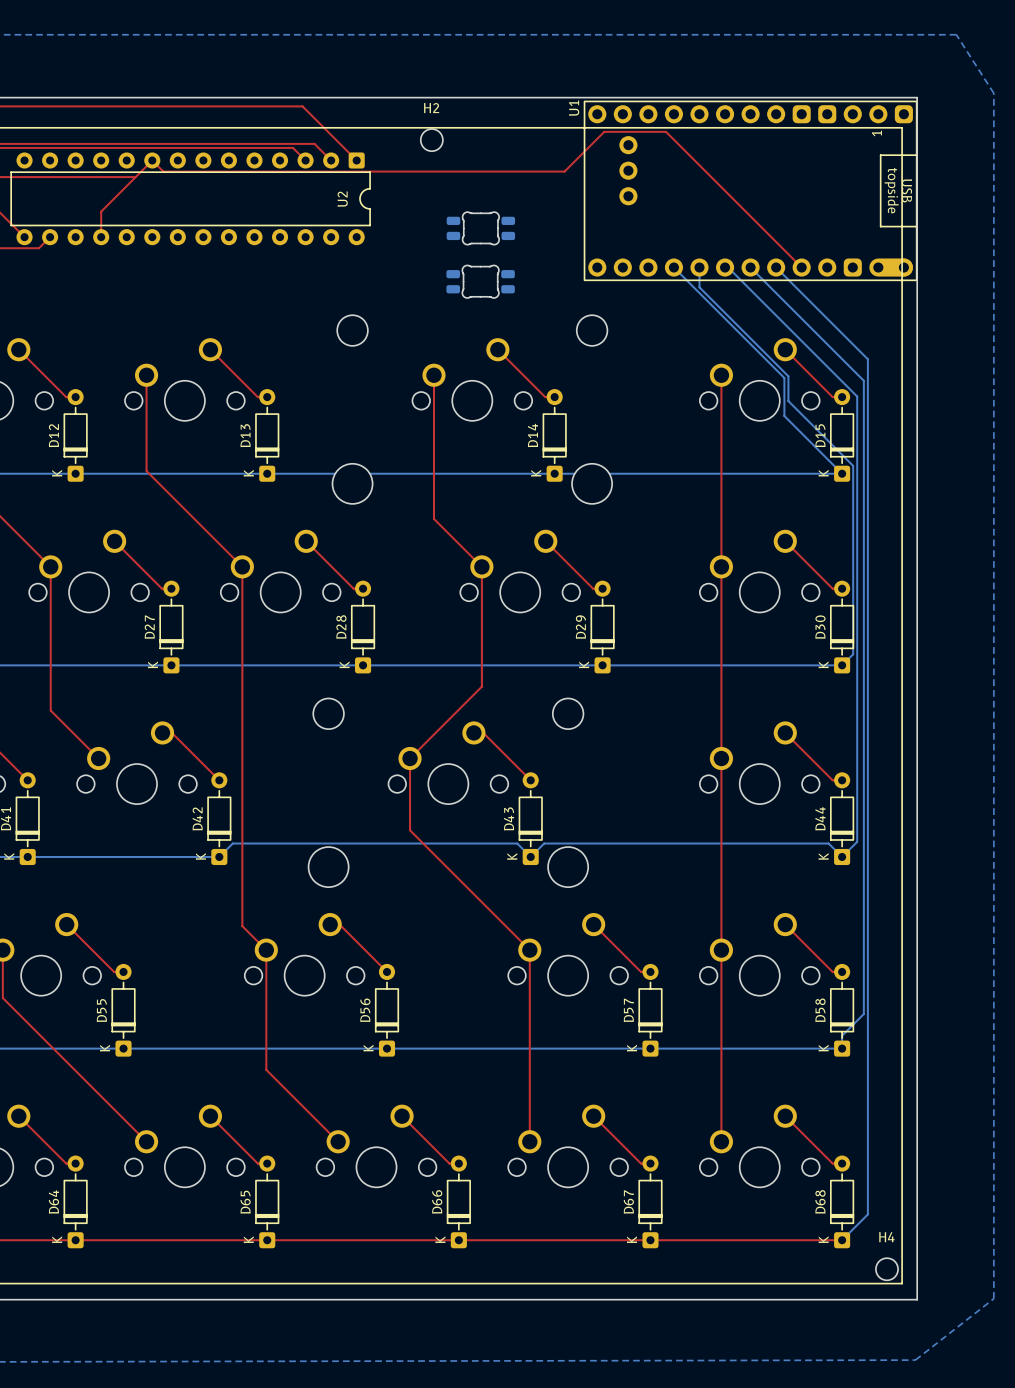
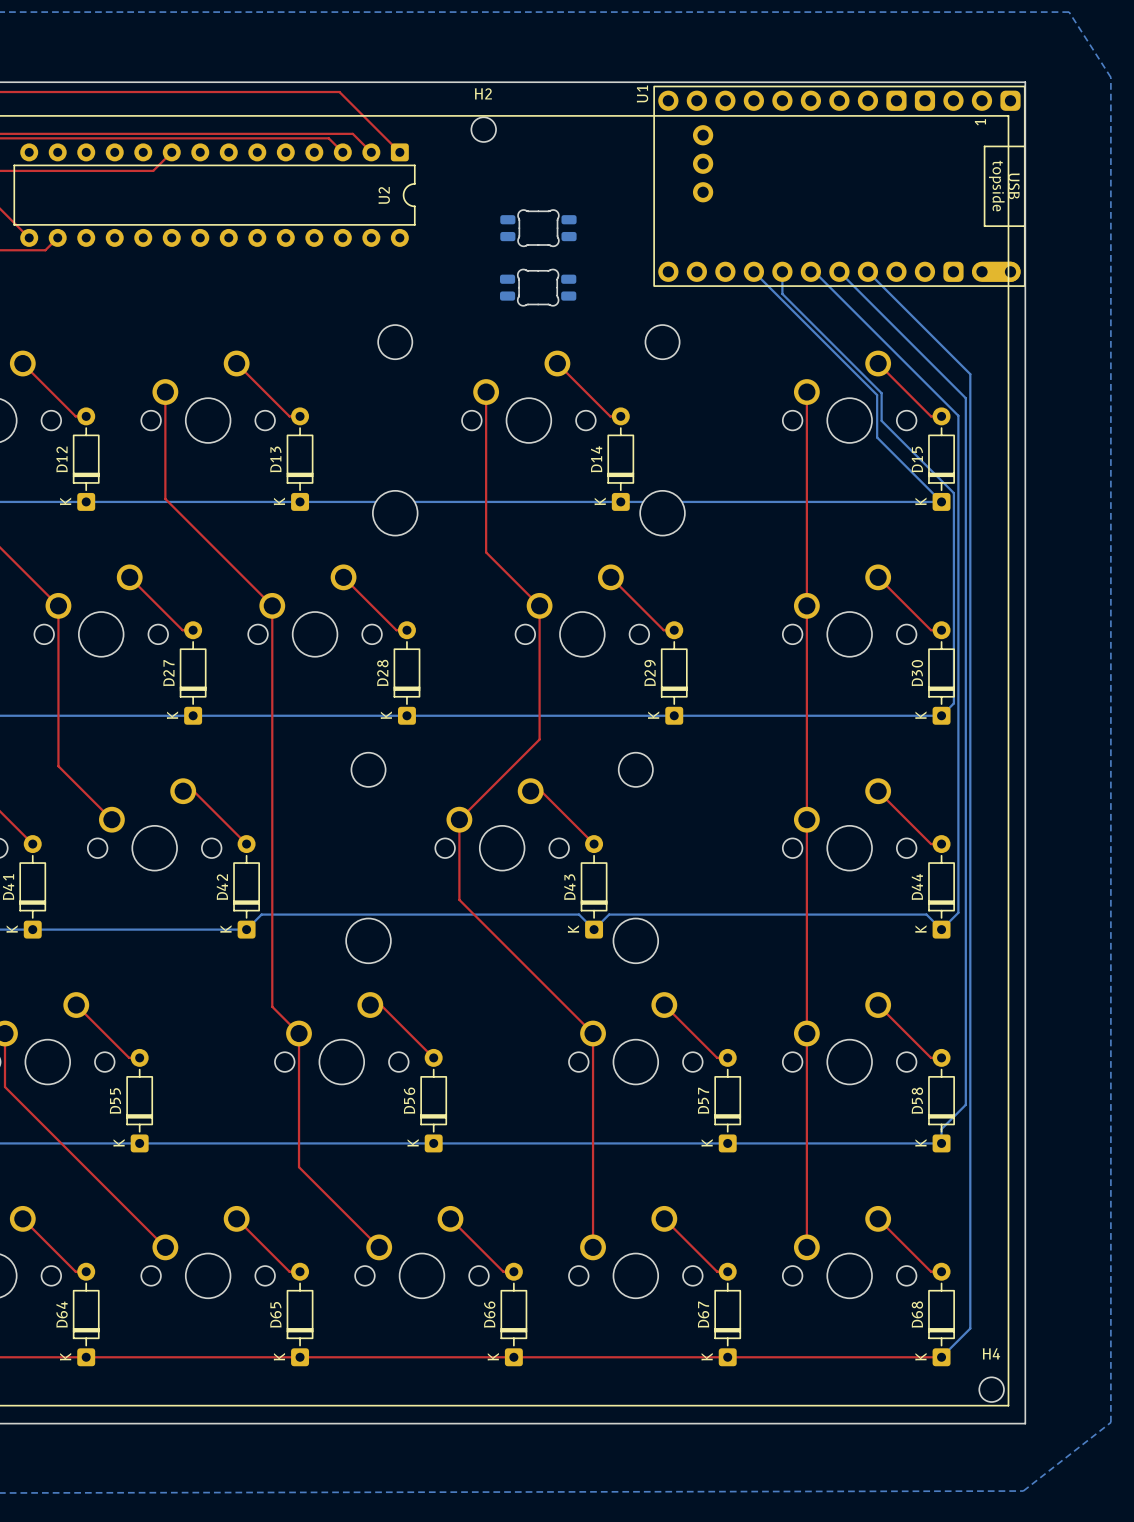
top track: (152, 160) (163, 171) (564, 171) (604, 131) (666, 131) (801, 267) -> none
top track: (135, 177) (101, 211) (101, 237) -> none

